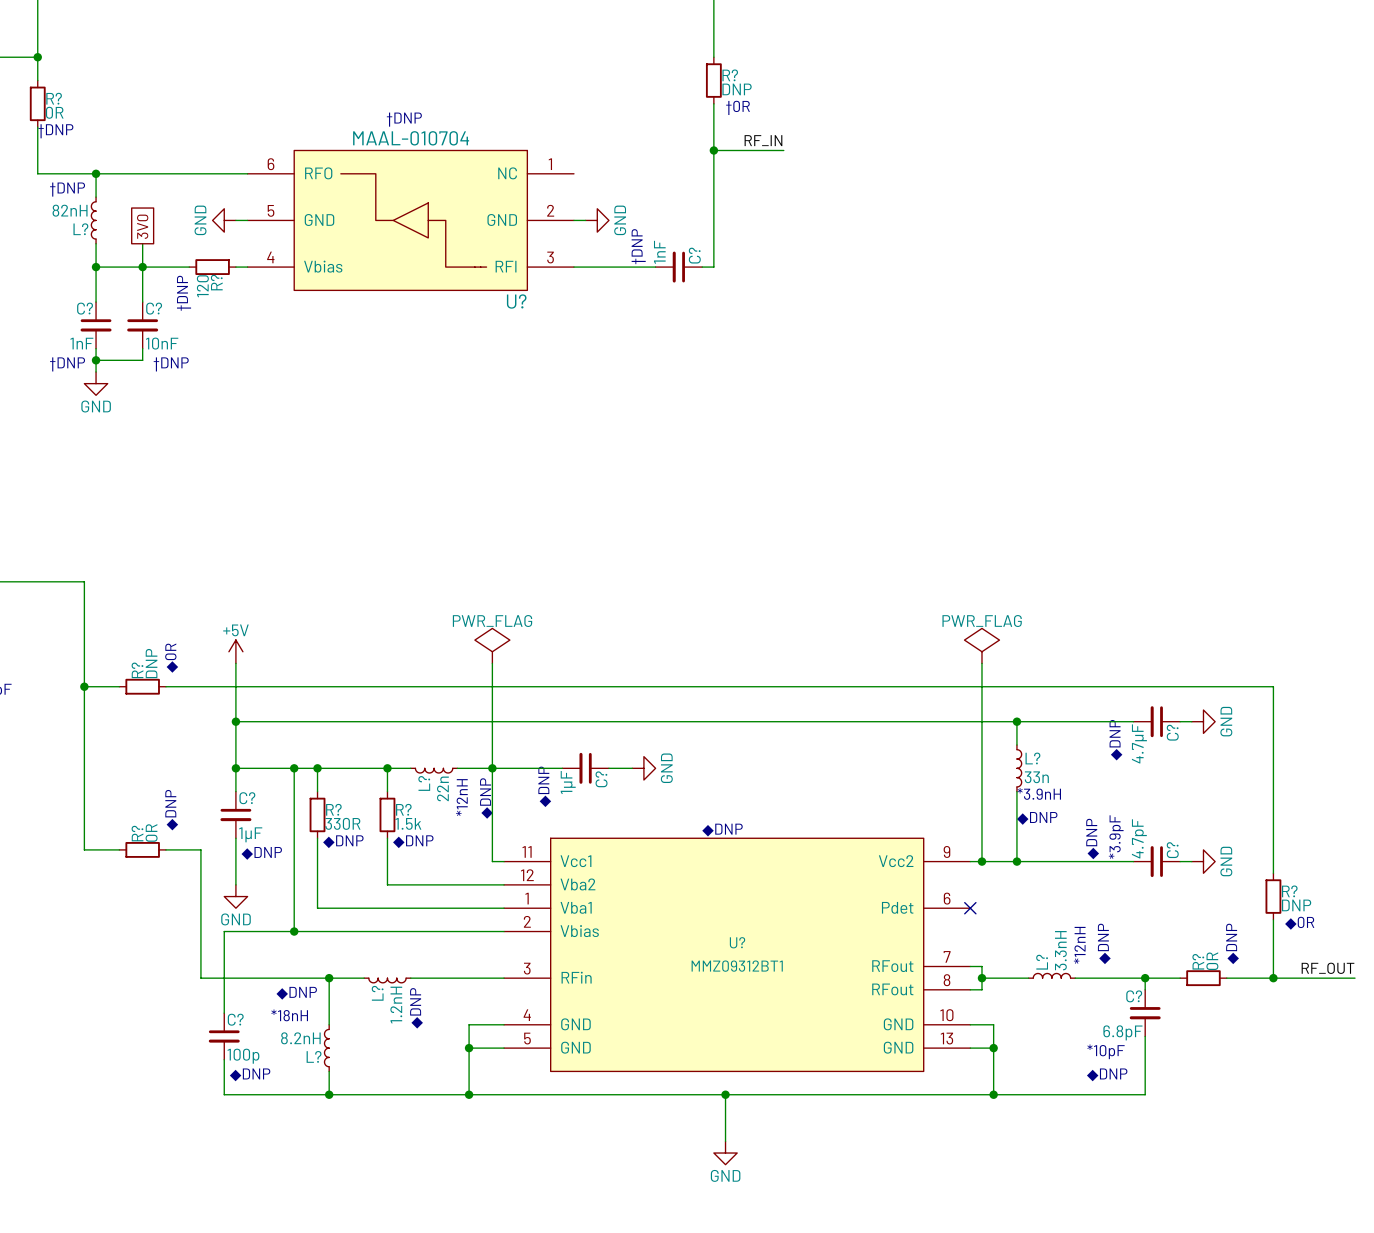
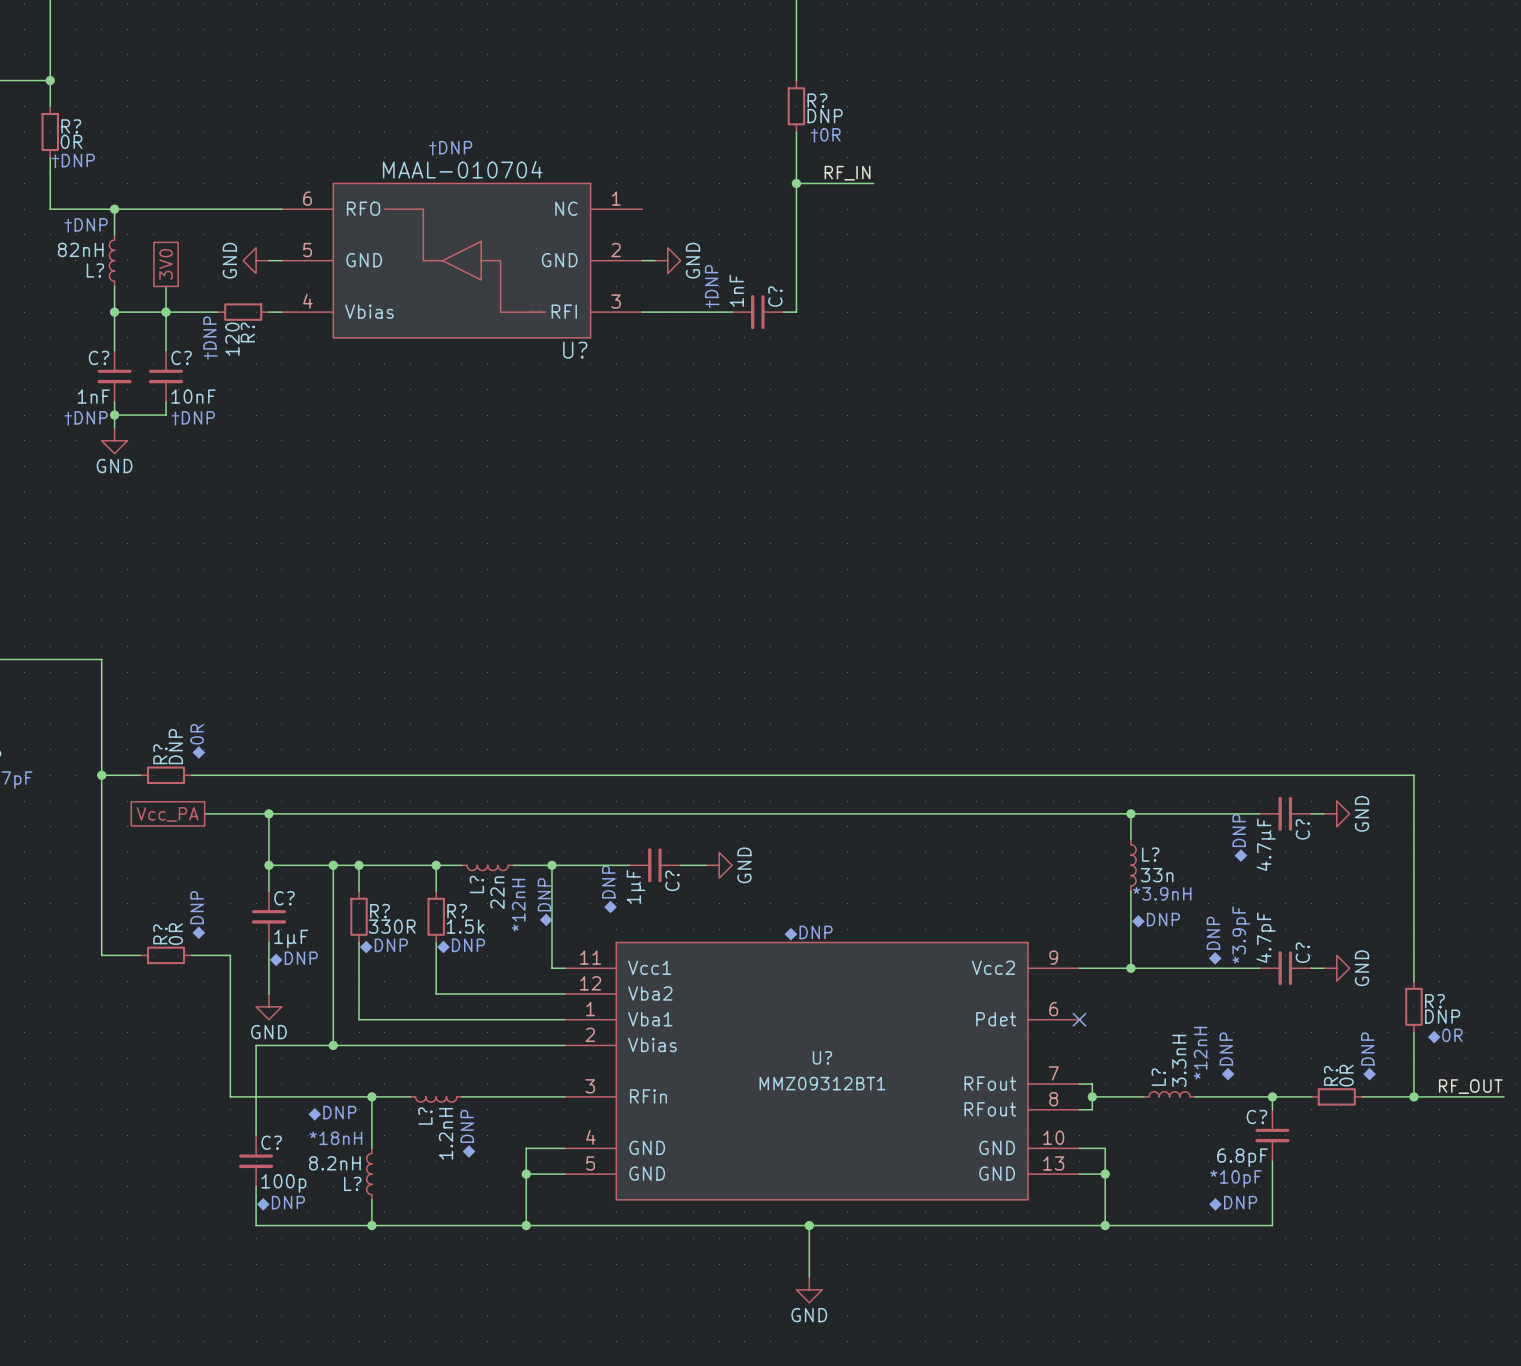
power symbol: PWR_FLAG (492, 645) -> none
power symbol: PWR_FLAG (981, 645) -> none
power symbol: +5V (235, 651) -> none
wire: (235, 663) (235, 721) -> (204, 813) (268, 813)
wire: (492, 663) (492, 768) -> none
wire: (981, 663) (981, 861) -> none
global label: none -> Vcc_PA (167, 814)
junction: (981, 861) -> none

